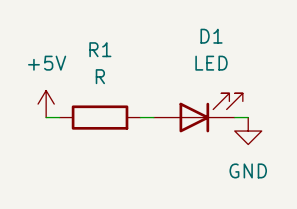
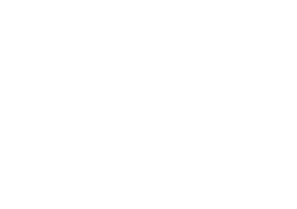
power symbol: +5V (46, 104) -> none
D1: LED (198, 112) -> none
wire: (46, 117) (59, 117) -> none
R1: R (100, 117) -> none
wire: (140, 117) (153, 117) -> none
wire: (234, 117) (248, 117) -> none
power symbol: GND (248, 131) -> none

